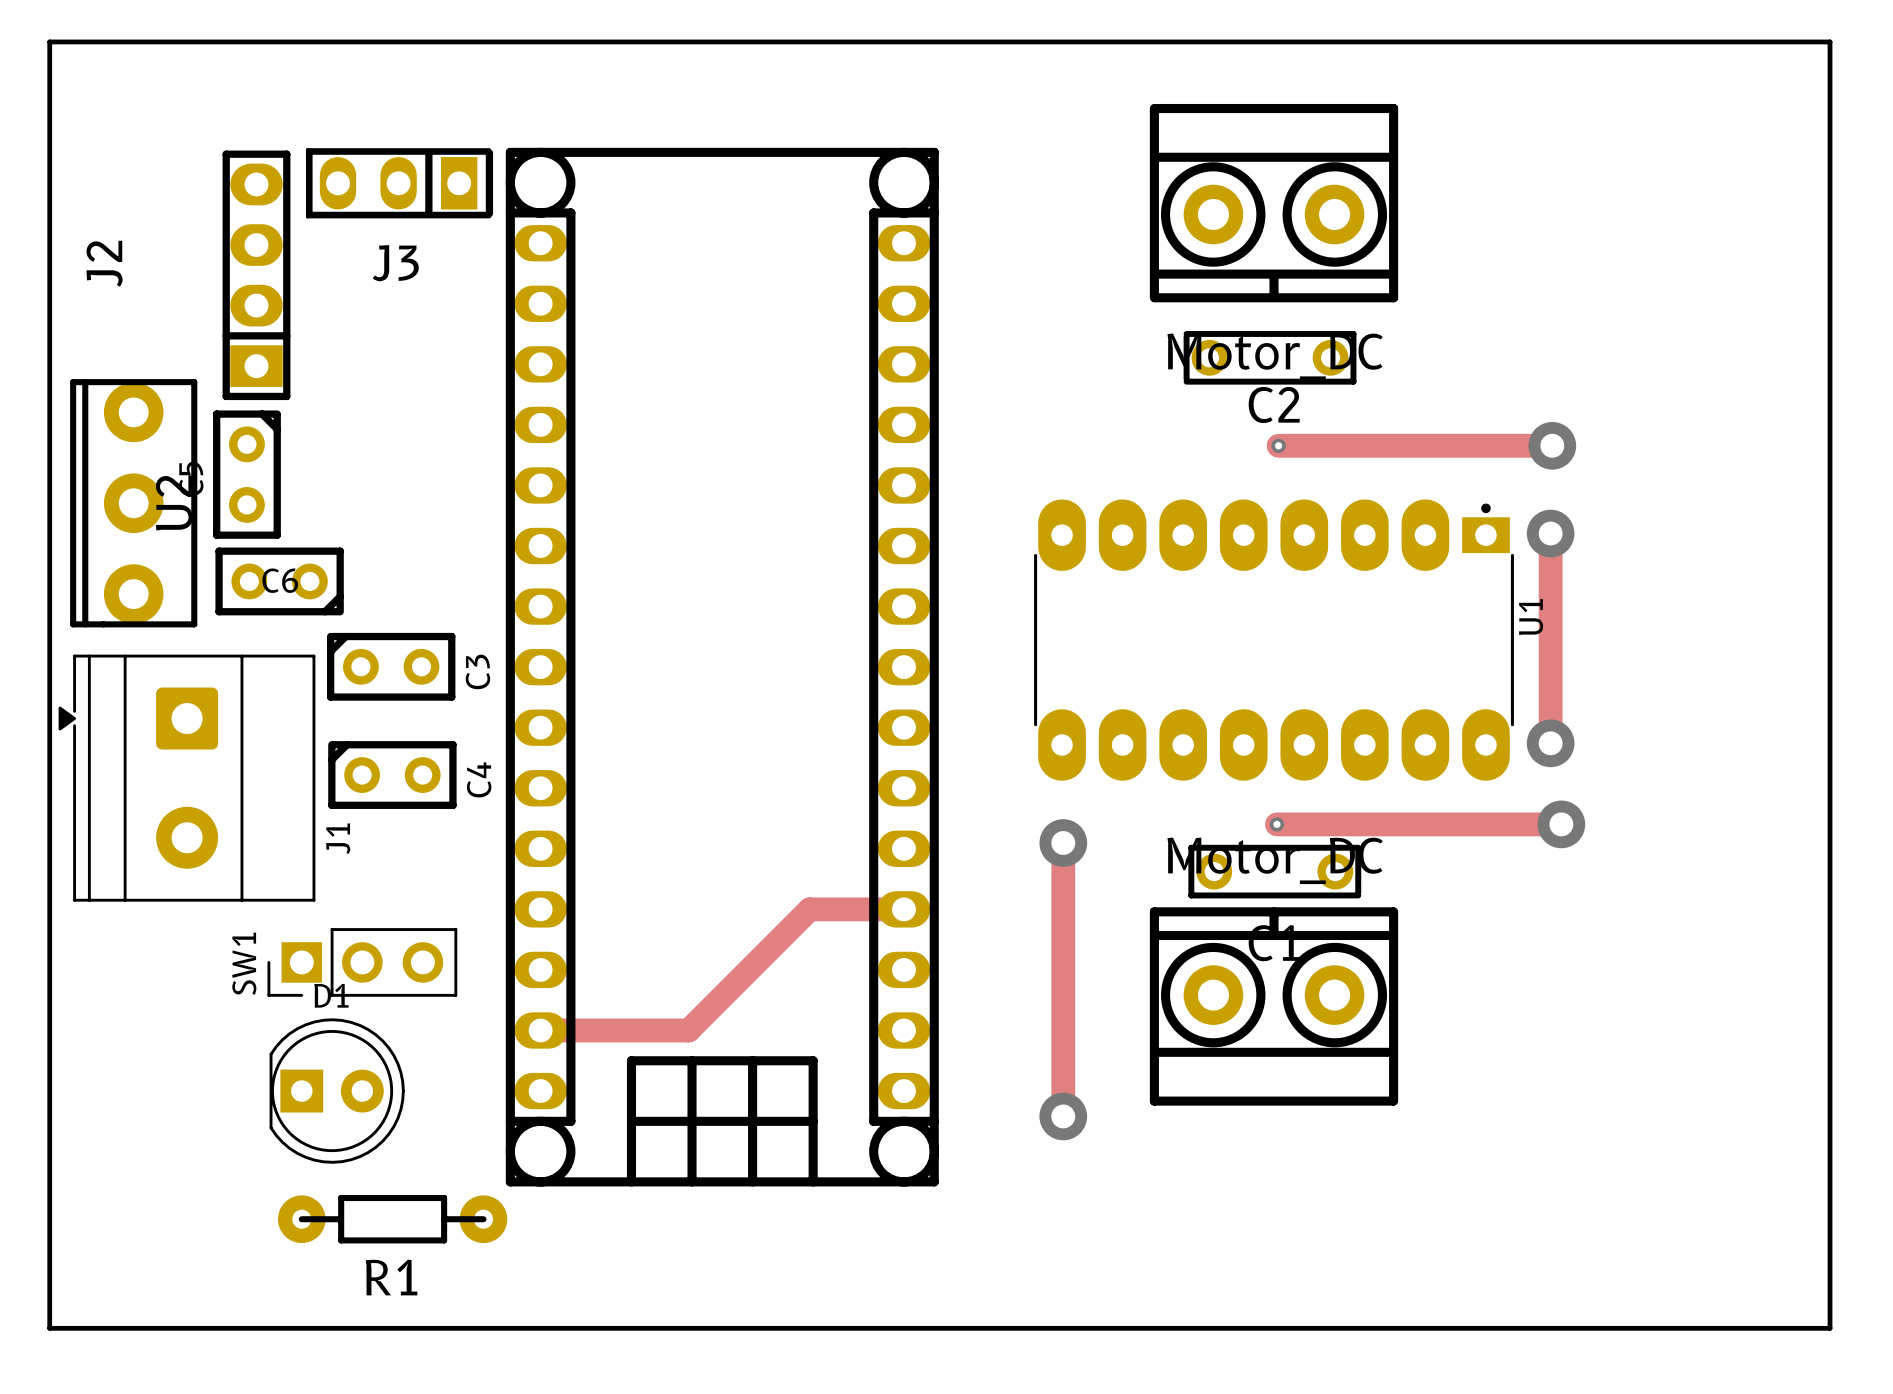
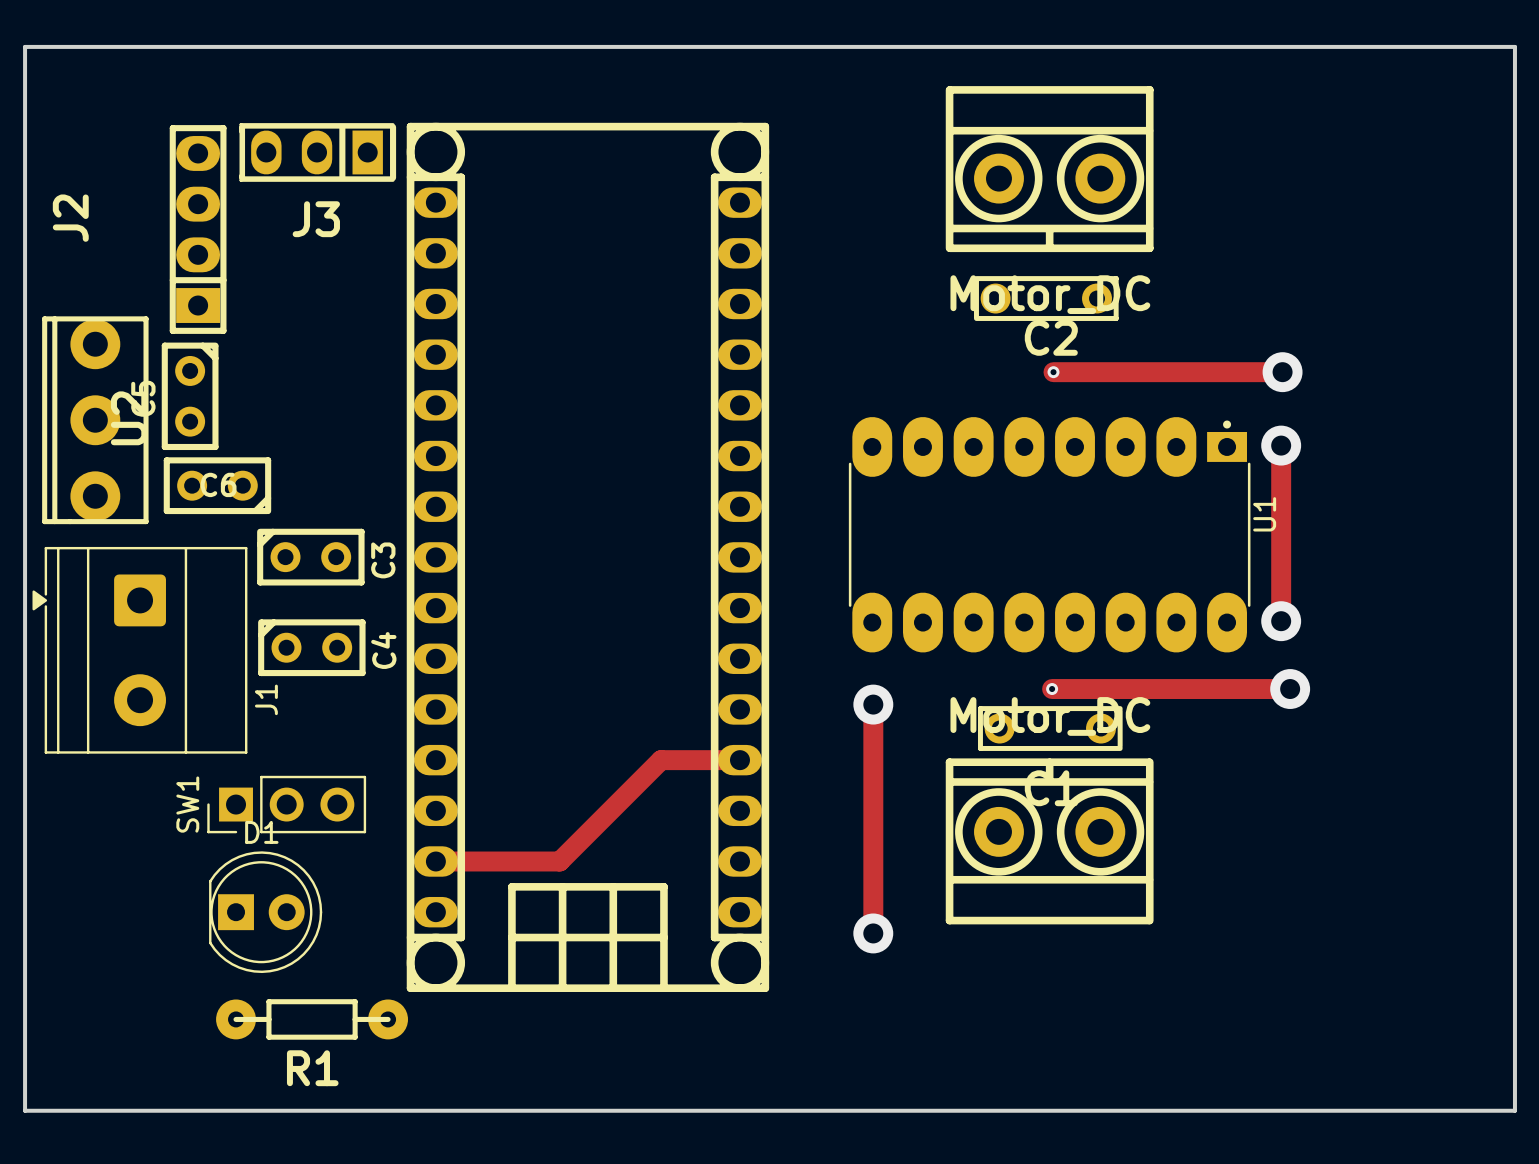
board edge: (49, 57) (49, 41) (1830, 41) (1830, 57) -> (25, 46) (1514, 46)

